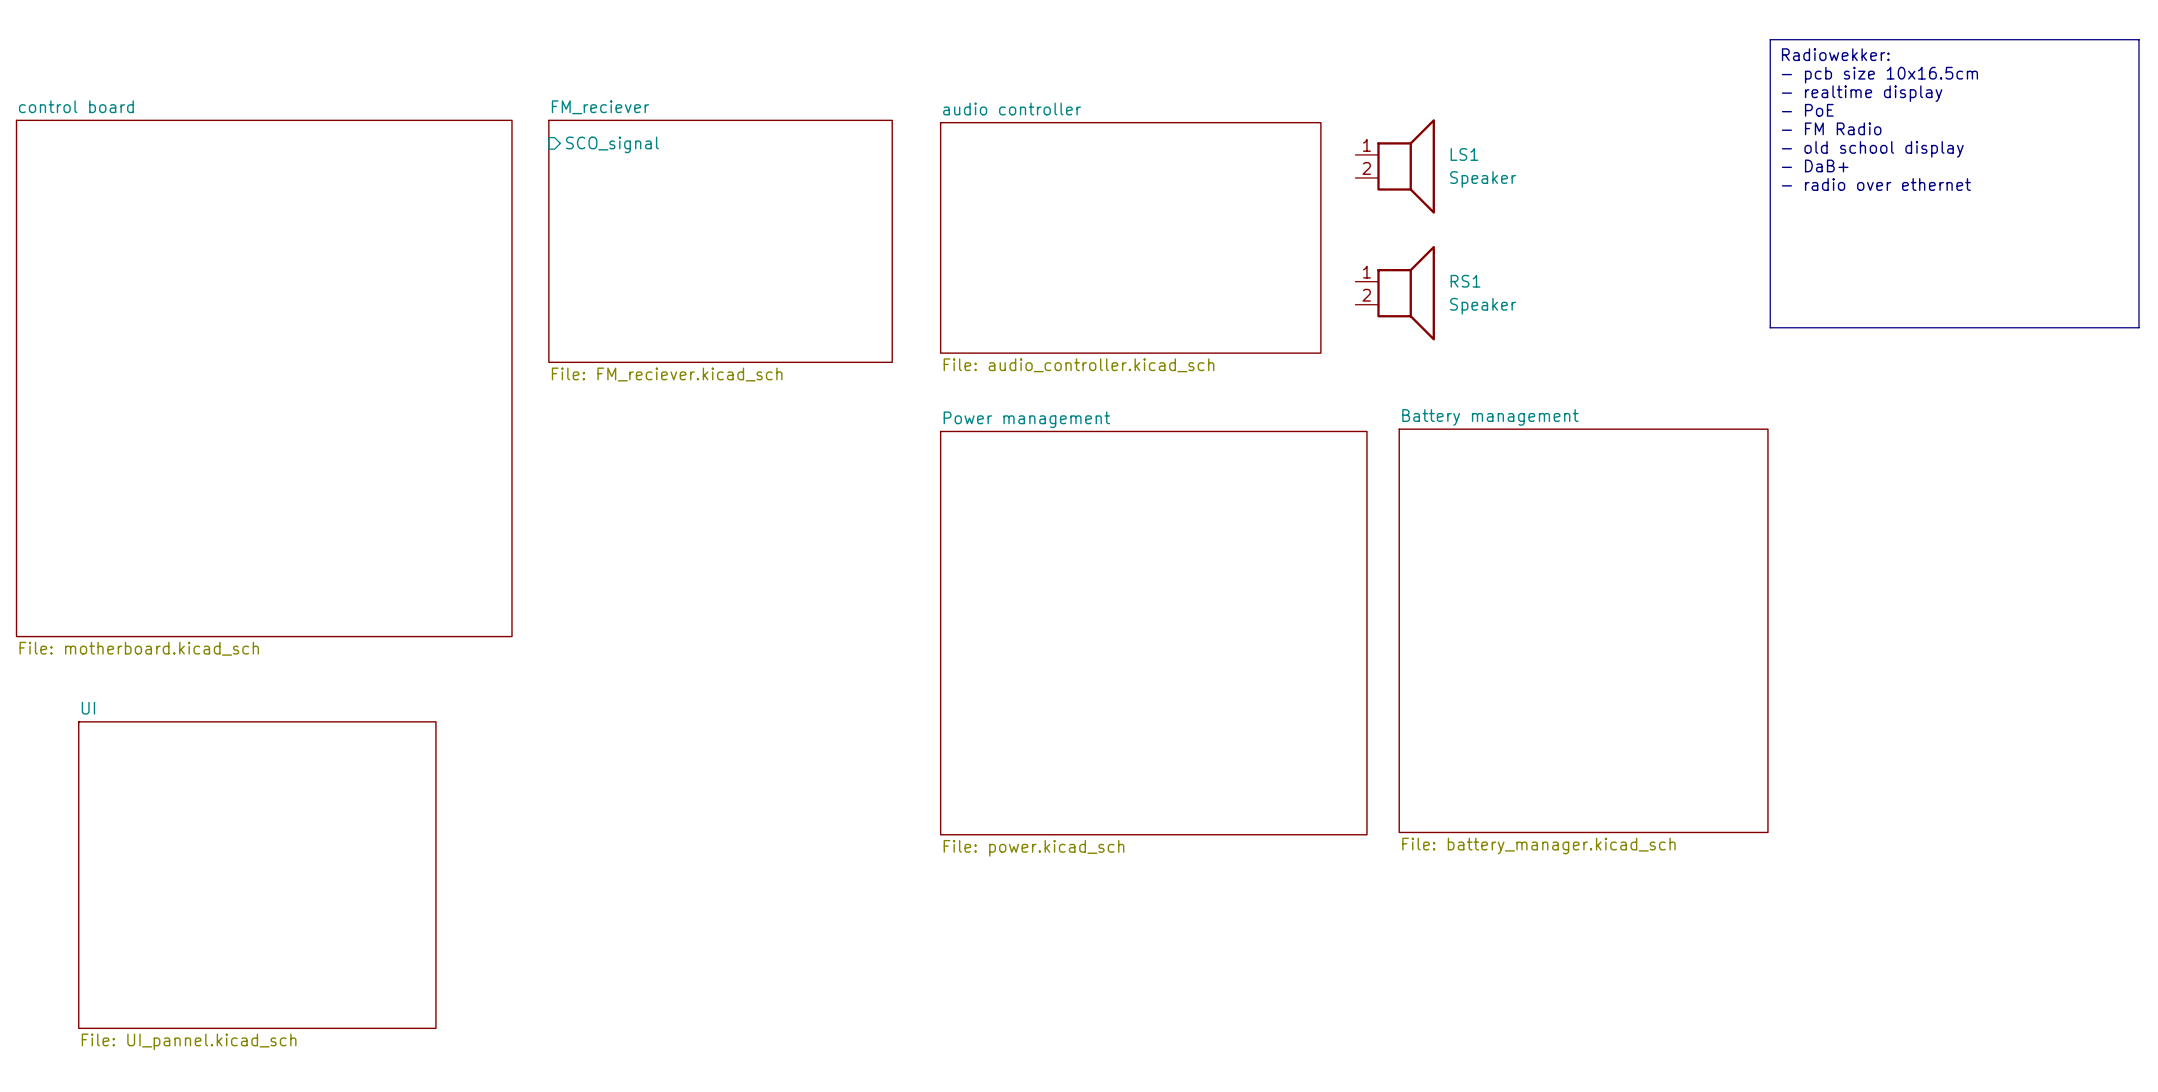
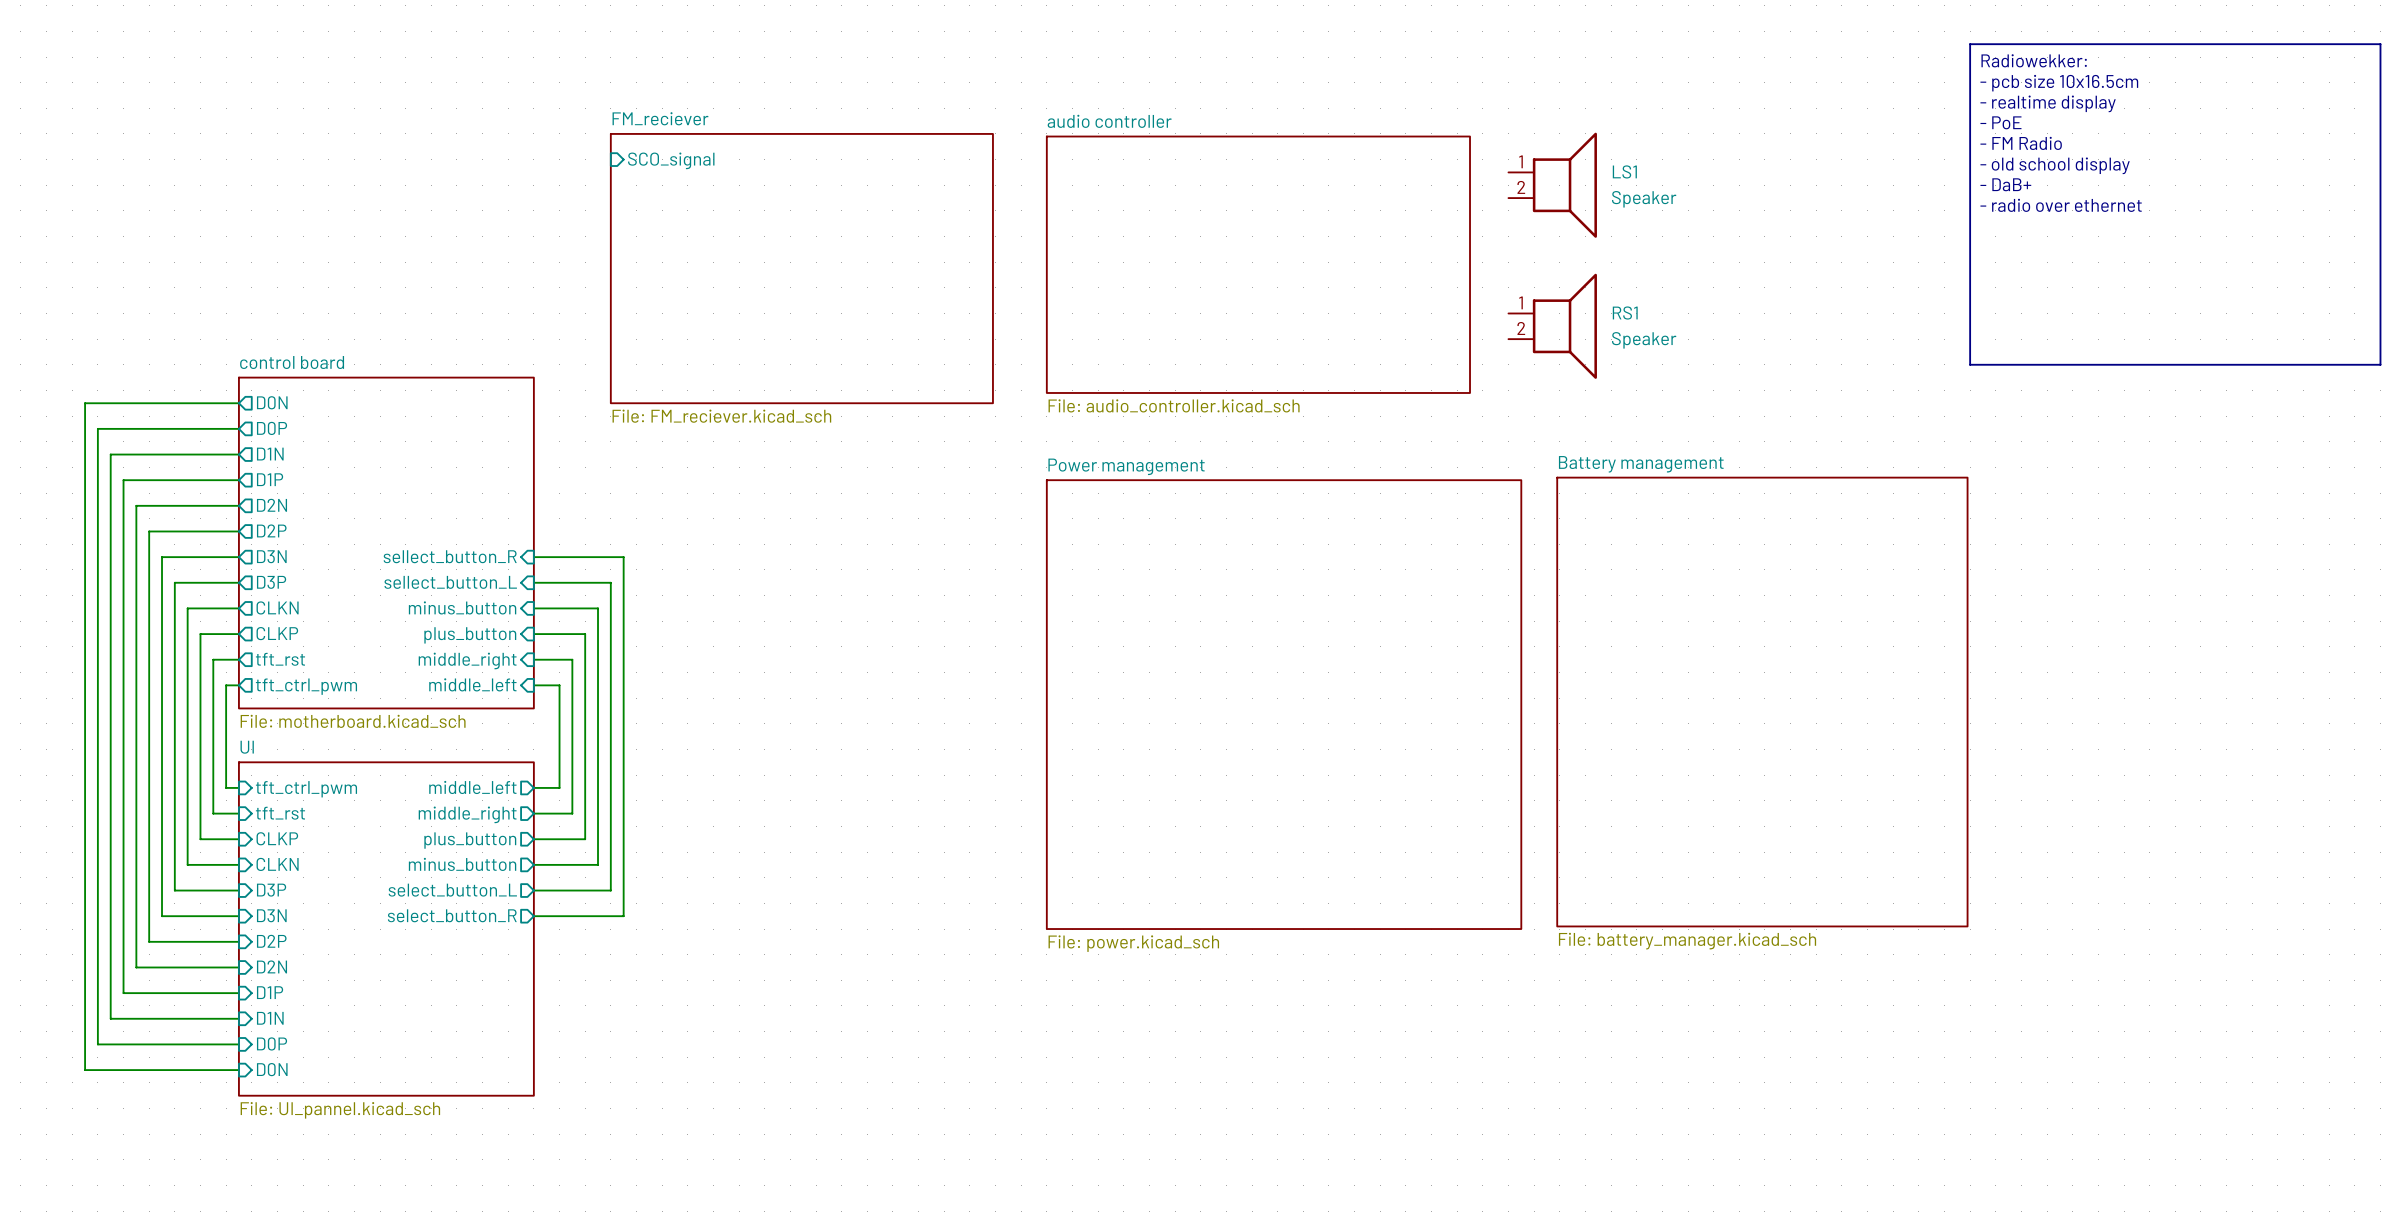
sheet pin: none -> D0N (272, 402)
wire: none -> (238, 403) (85, 403) (85, 1070) (238, 1070)
sheet control board: File: motherboard.kicad_sch (264, 378) -> none
sheet pin: none -> D0P (272, 428)
wire: none -> (238, 428) (97, 428) (97, 1044) (238, 1044)
wire: none -> (238, 454) (110, 454) (110, 1018) (238, 1018)
sheet pin: none -> D1N (270, 454)
wire: none -> (238, 480) (123, 480) (123, 993) (238, 993)
sheet pin: none -> D1P (270, 479)
wire: none -> (238, 505) (136, 505) (136, 967) (238, 967)
sheet pin: none -> D2N (271, 505)
wire: none -> (238, 531) (149, 531) (149, 941) (238, 941)
sheet pin: none -> D2P (271, 530)
sheet control board: none -> File: motherboard.kicad_sch (386, 543)
wire: none -> (238, 557) (162, 557) (162, 916) (238, 916)
sheet pin: none -> D3N (271, 556)
sheet pin: none -> sellect_button_R (450, 556)
wire: none -> (533, 557) (623, 557) (623, 916) (533, 916)
wire: none -> (238, 582) (174, 582) (174, 890) (238, 890)
sheet pin: none -> D3P (271, 582)
sheet pin: none -> sellect_button_L (450, 582)
wire: none -> (533, 582) (610, 582) (610, 890) (533, 890)
wire: none -> (238, 608) (187, 608) (187, 864) (238, 864)
sheet pin: none -> CLKN (277, 607)
sheet pin: none -> minus_button (462, 607)
wire: none -> (533, 608) (598, 608) (598, 864) (533, 864)
wire: none -> (238, 634) (200, 634) (200, 839) (238, 839)
sheet pin: none -> CLKP (277, 633)
wire: none -> (533, 634) (585, 634) (585, 839) (533, 839)
sheet pin: none -> plus_button (470, 635)
wire: none -> (238, 659) (213, 659) (213, 813) (238, 813)
sheet pin: none -> tft_rst (280, 659)
wire: none -> (533, 659) (572, 659) (572, 813) (533, 813)
sheet pin: none -> middle_right (467, 660)
wire: none -> (238, 685) (226, 685) (226, 787) (238, 787)
sheet pin: none -> middle_left (472, 684)
wire: none -> (533, 685) (559, 685) (559, 787) (533, 787)
sheet pin: none -> tft_ctrl_pwm (306, 686)
sheet pin: none -> middle_left (472, 787)
sheet pin: none -> tft_ctrl_pwm (306, 789)
sheet pin: none -> tft_rst (280, 813)
sheet pin: none -> middle_right (467, 814)
sheet pin: none -> CLKP (277, 838)
sheet pin: none -> plus_button (470, 840)
sheet pin: none -> CLKN (277, 864)
sheet pin: none -> minus_button (462, 864)
sheet pin: none -> D3P (271, 890)
sheet pin: none -> select_button_L (452, 890)
sheet pin: none -> D3N (271, 915)
sheet pin: none -> select_button_R (452, 915)
sheet UI: none -> File: UI_pannel.kicad_sch (386, 929)
sheet pin: none -> D2P (271, 941)
sheet pin: none -> D2N (271, 966)
sheet UI: File: UI_pannel.kicad_sch (257, 875) -> none
sheet pin: none -> D1P (270, 992)
sheet pin: none -> D1N (270, 1018)
sheet pin: none -> D0P (272, 1043)
sheet pin: none -> D0N (272, 1069)

